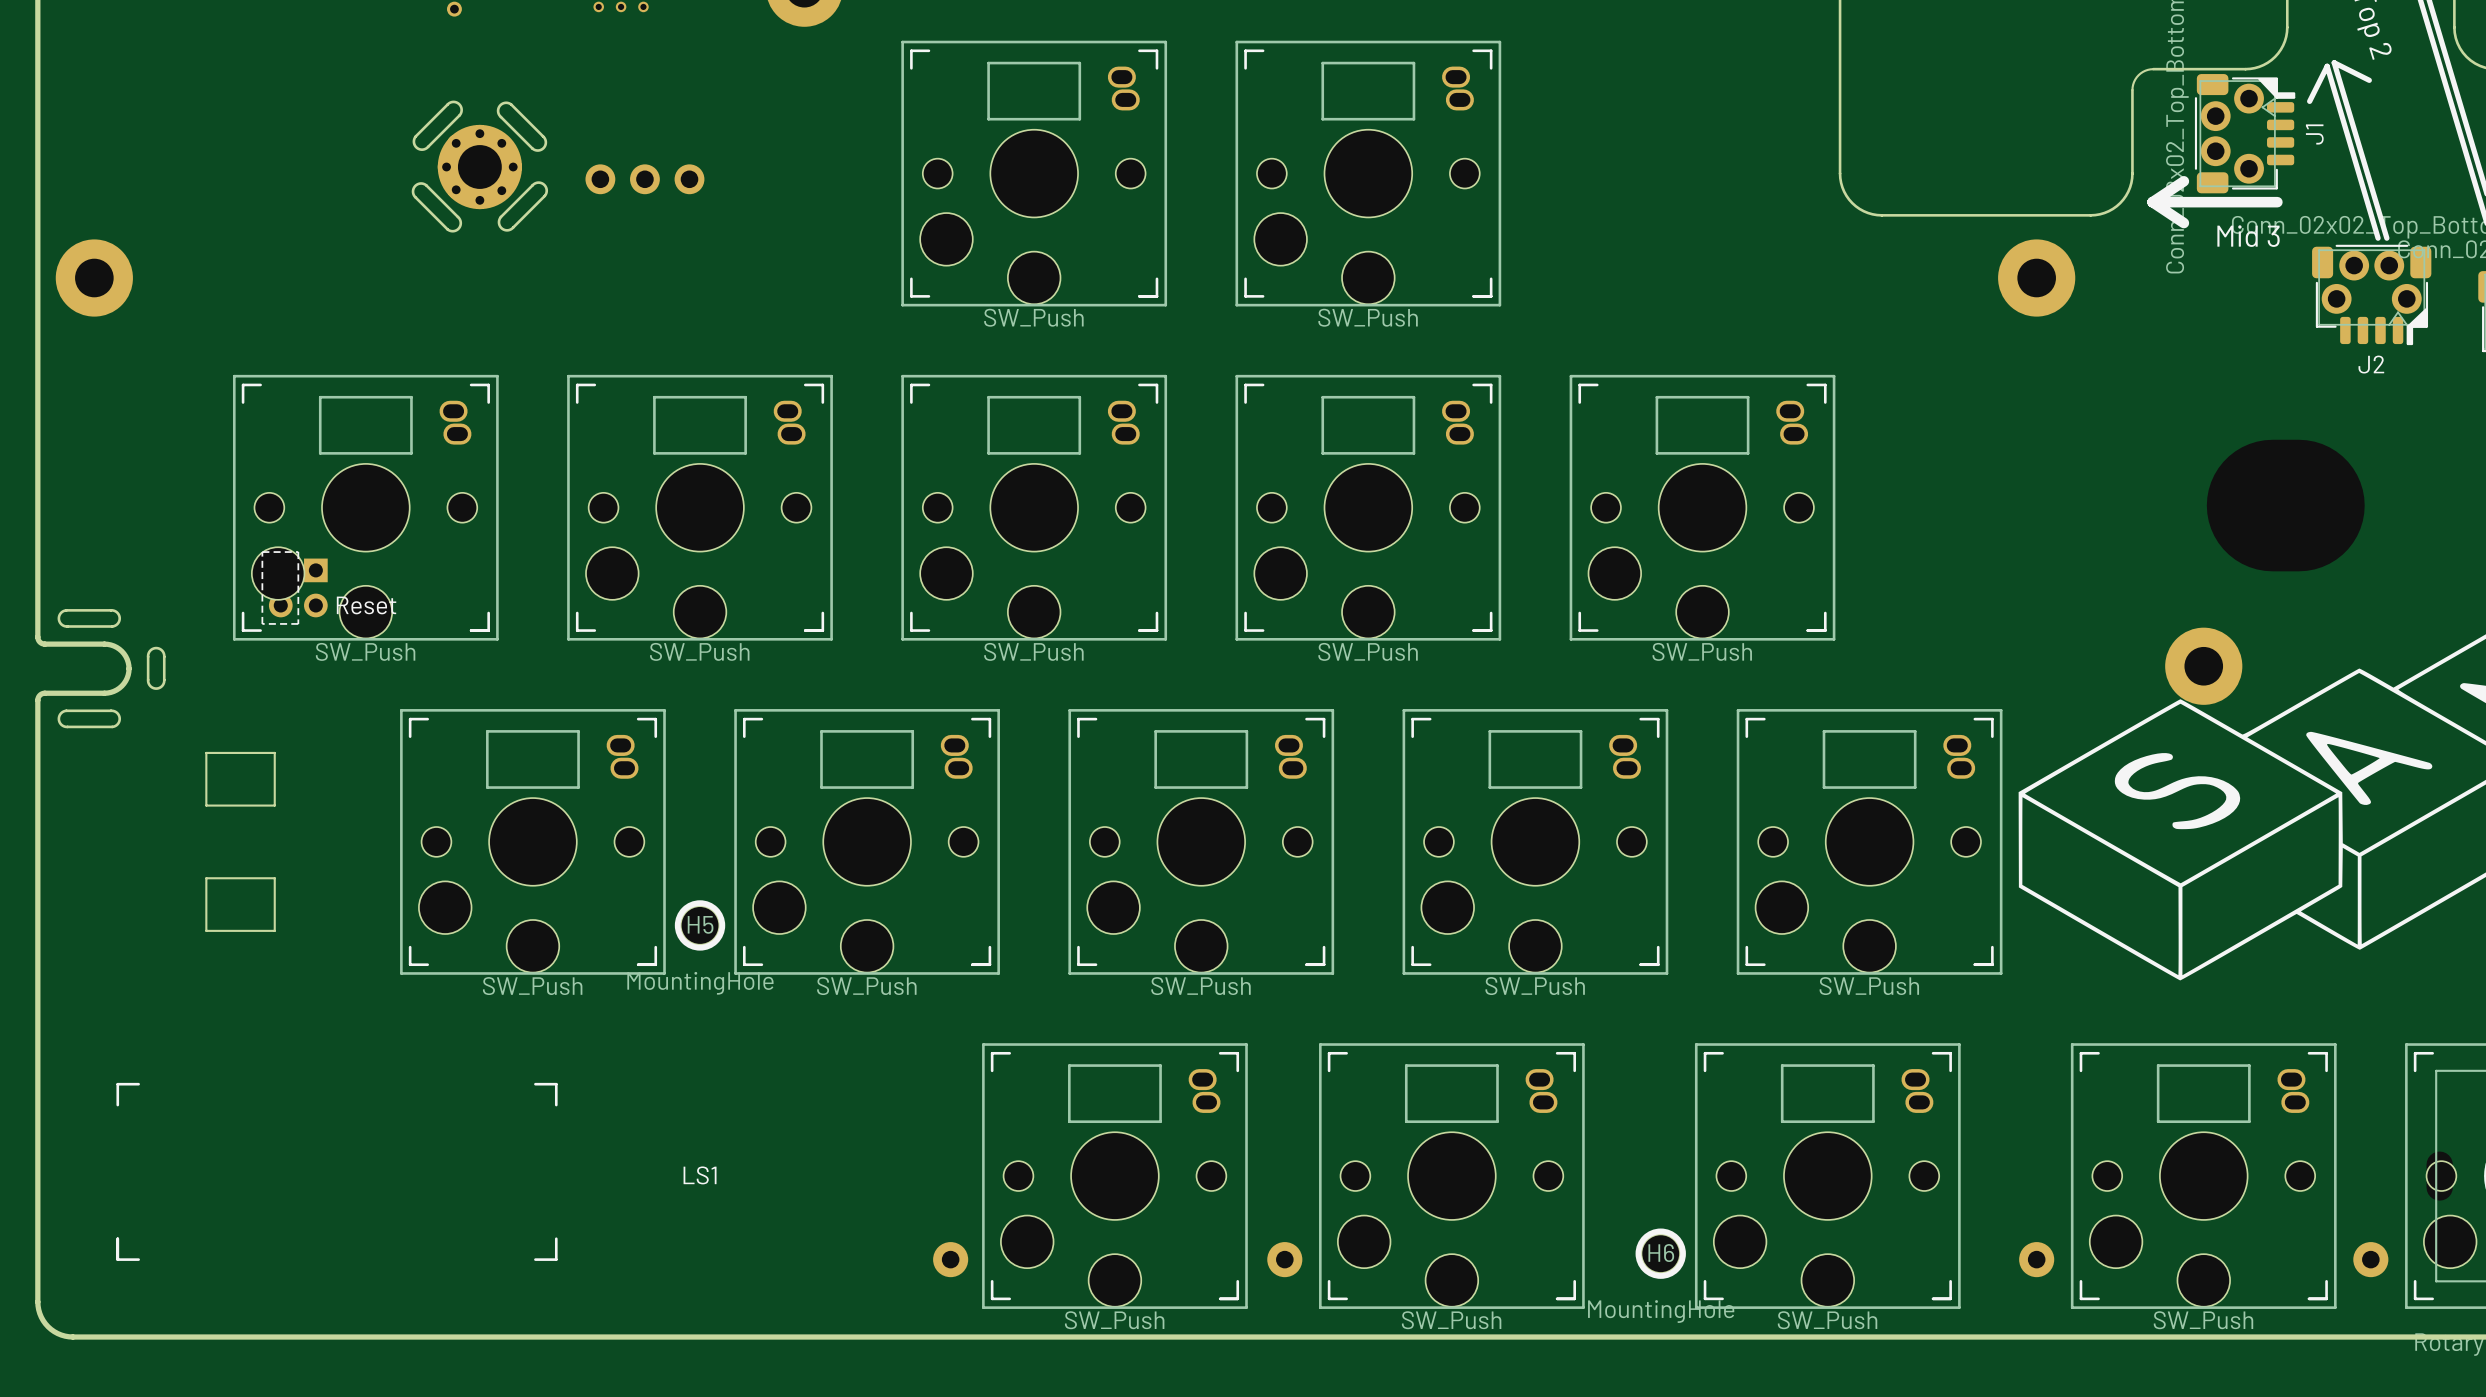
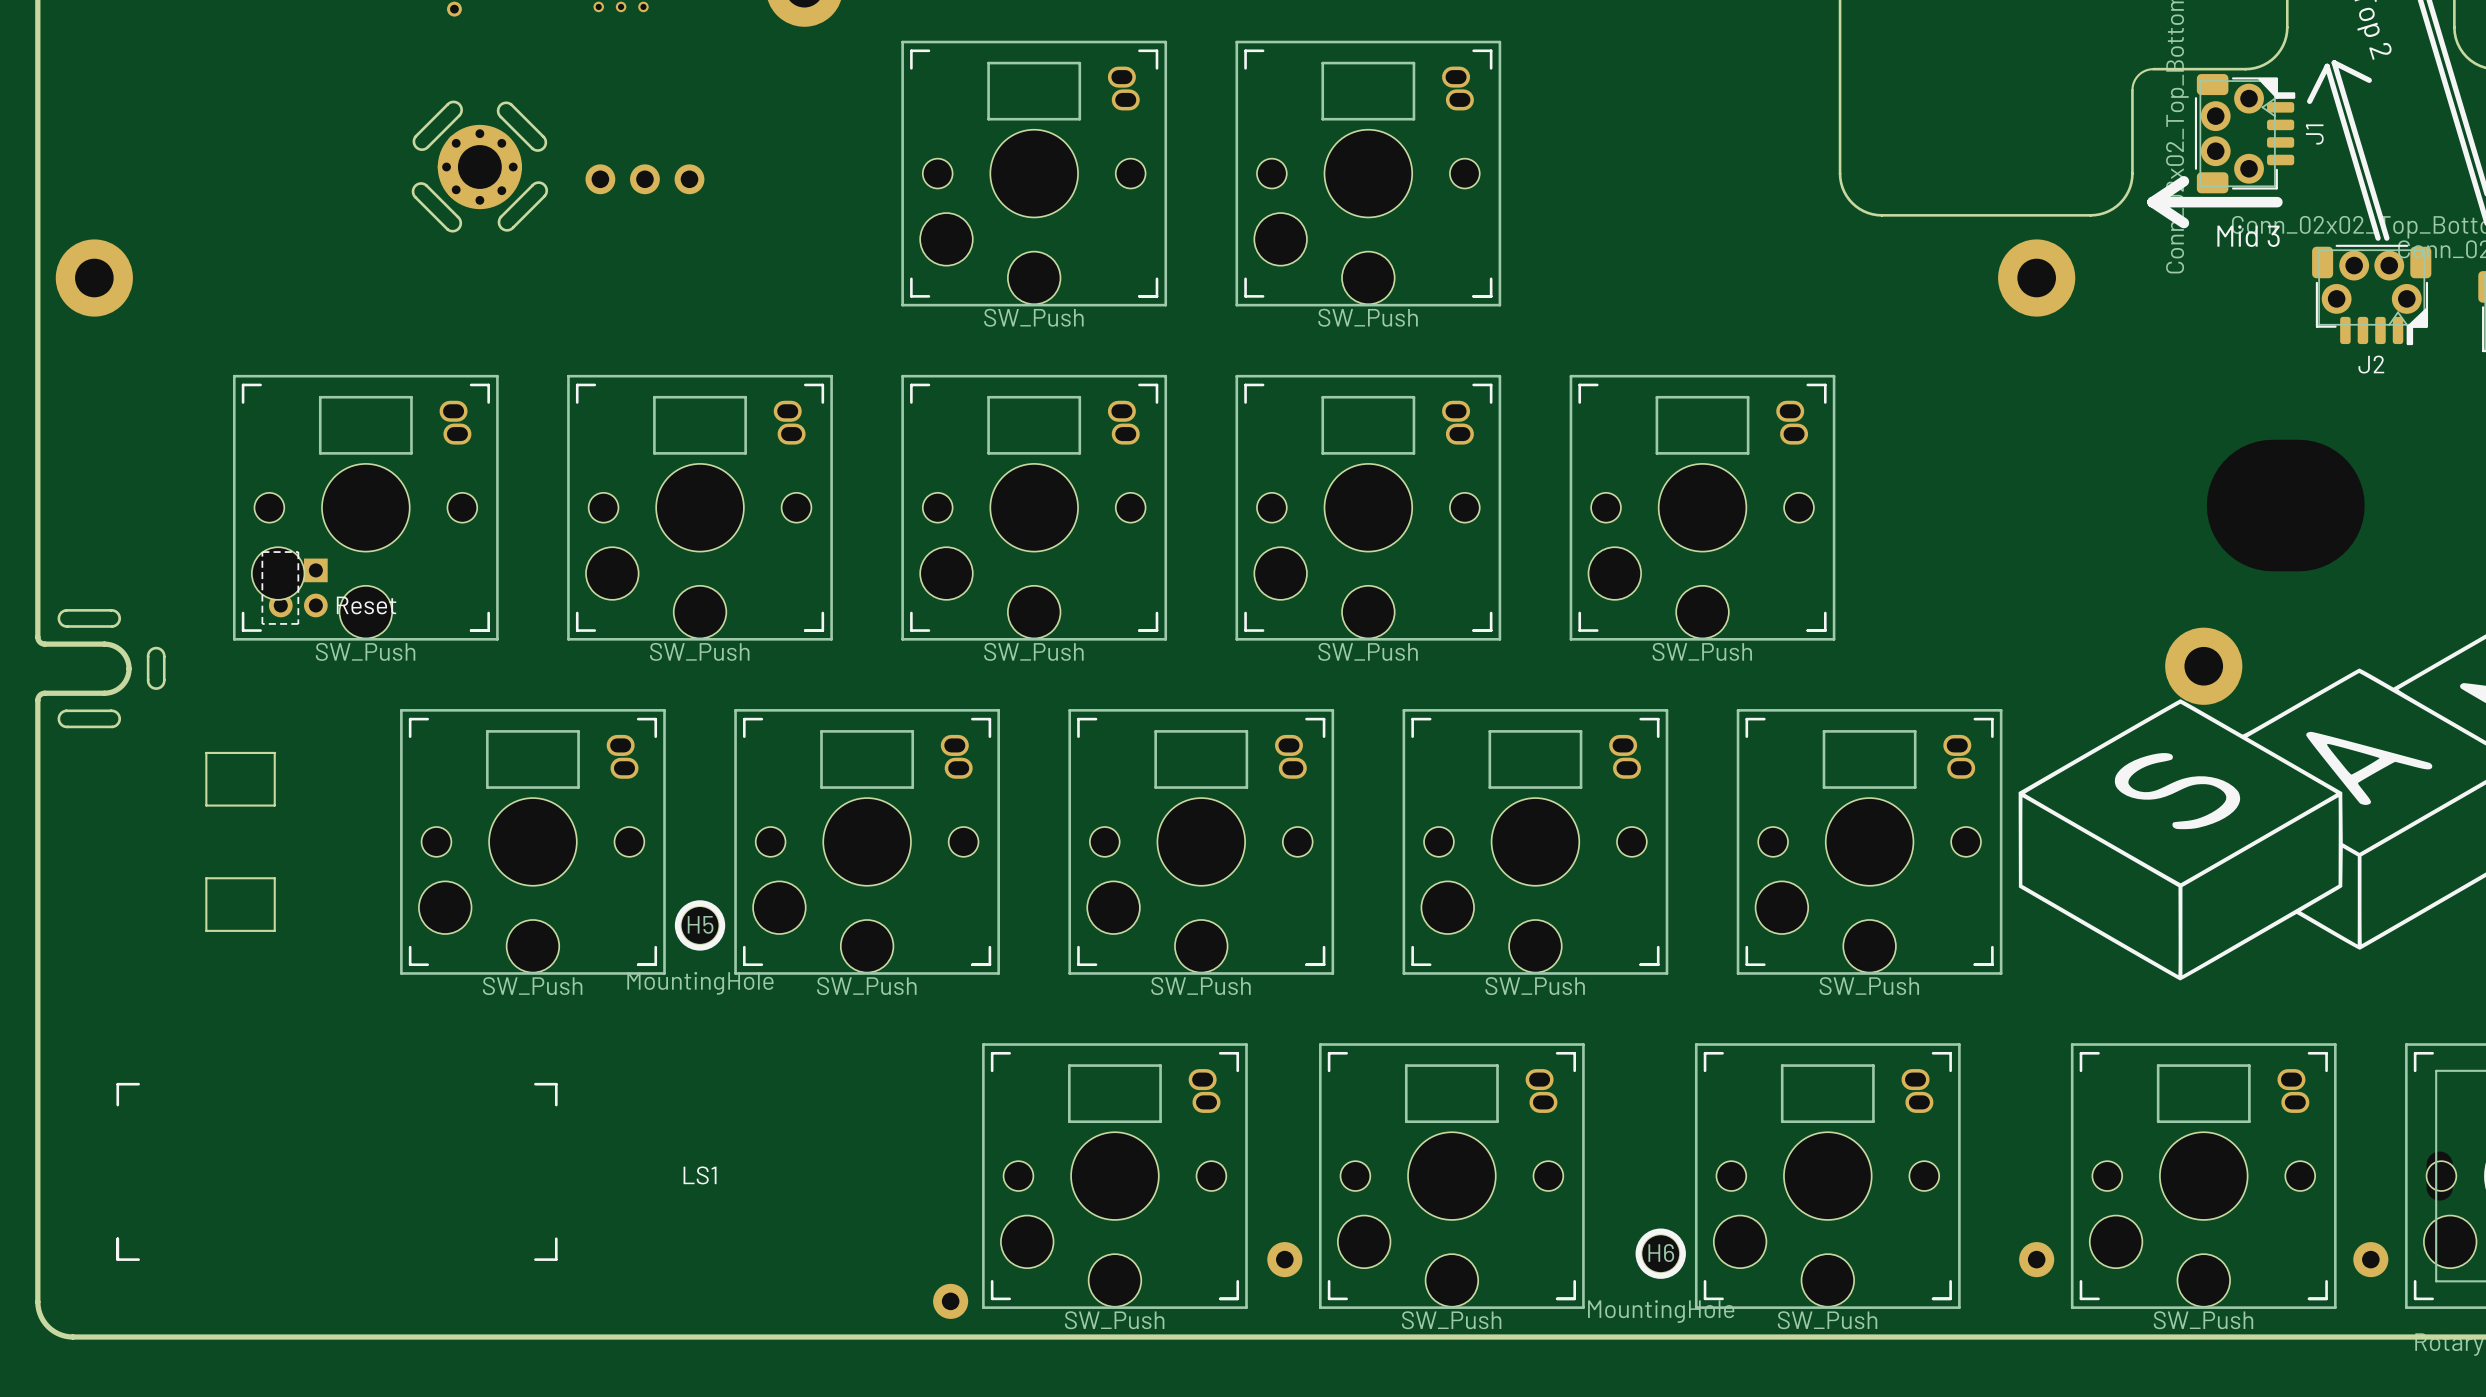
part position: (950, 1259) -> (950, 1301)

